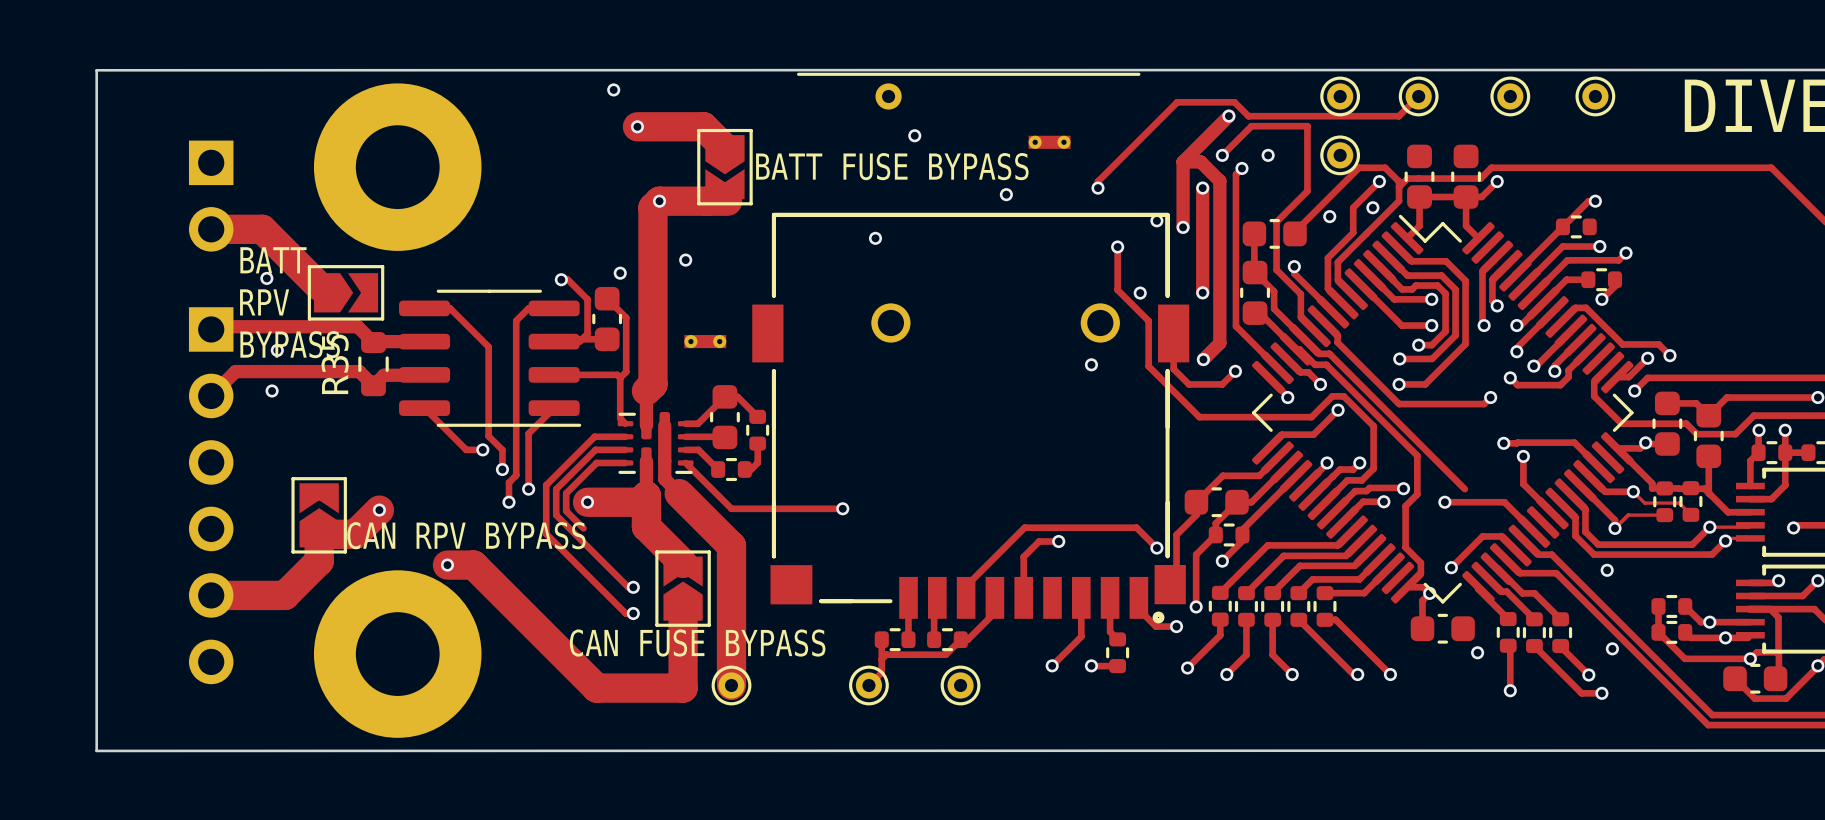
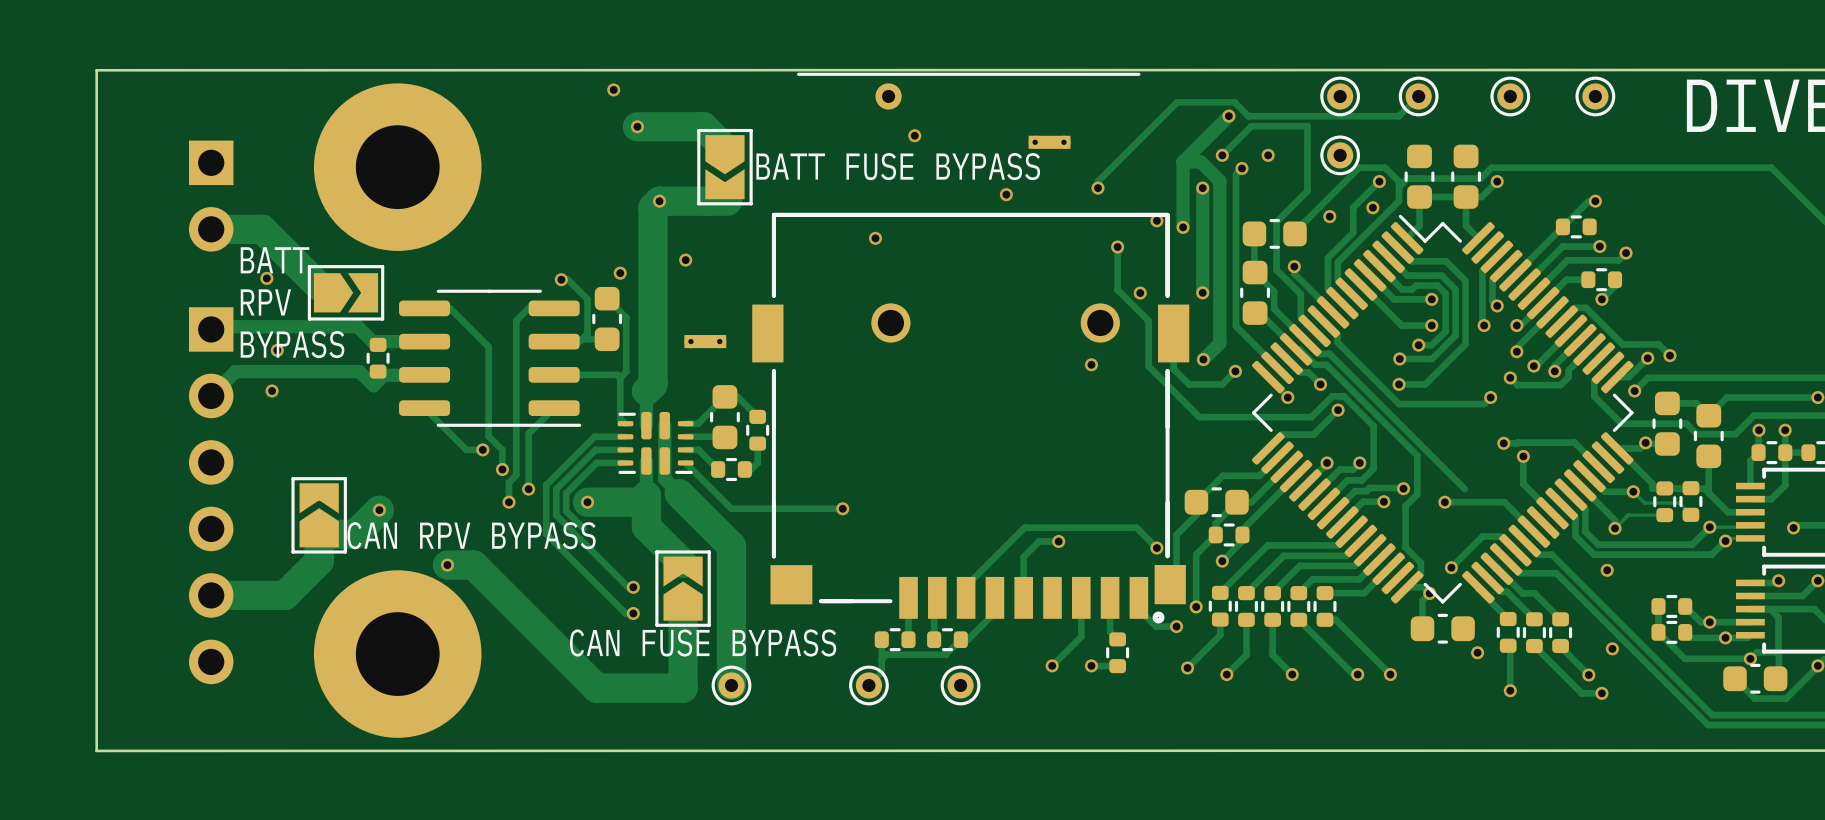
part: none -> (378, 358)
R35: (373, 364) -> none

